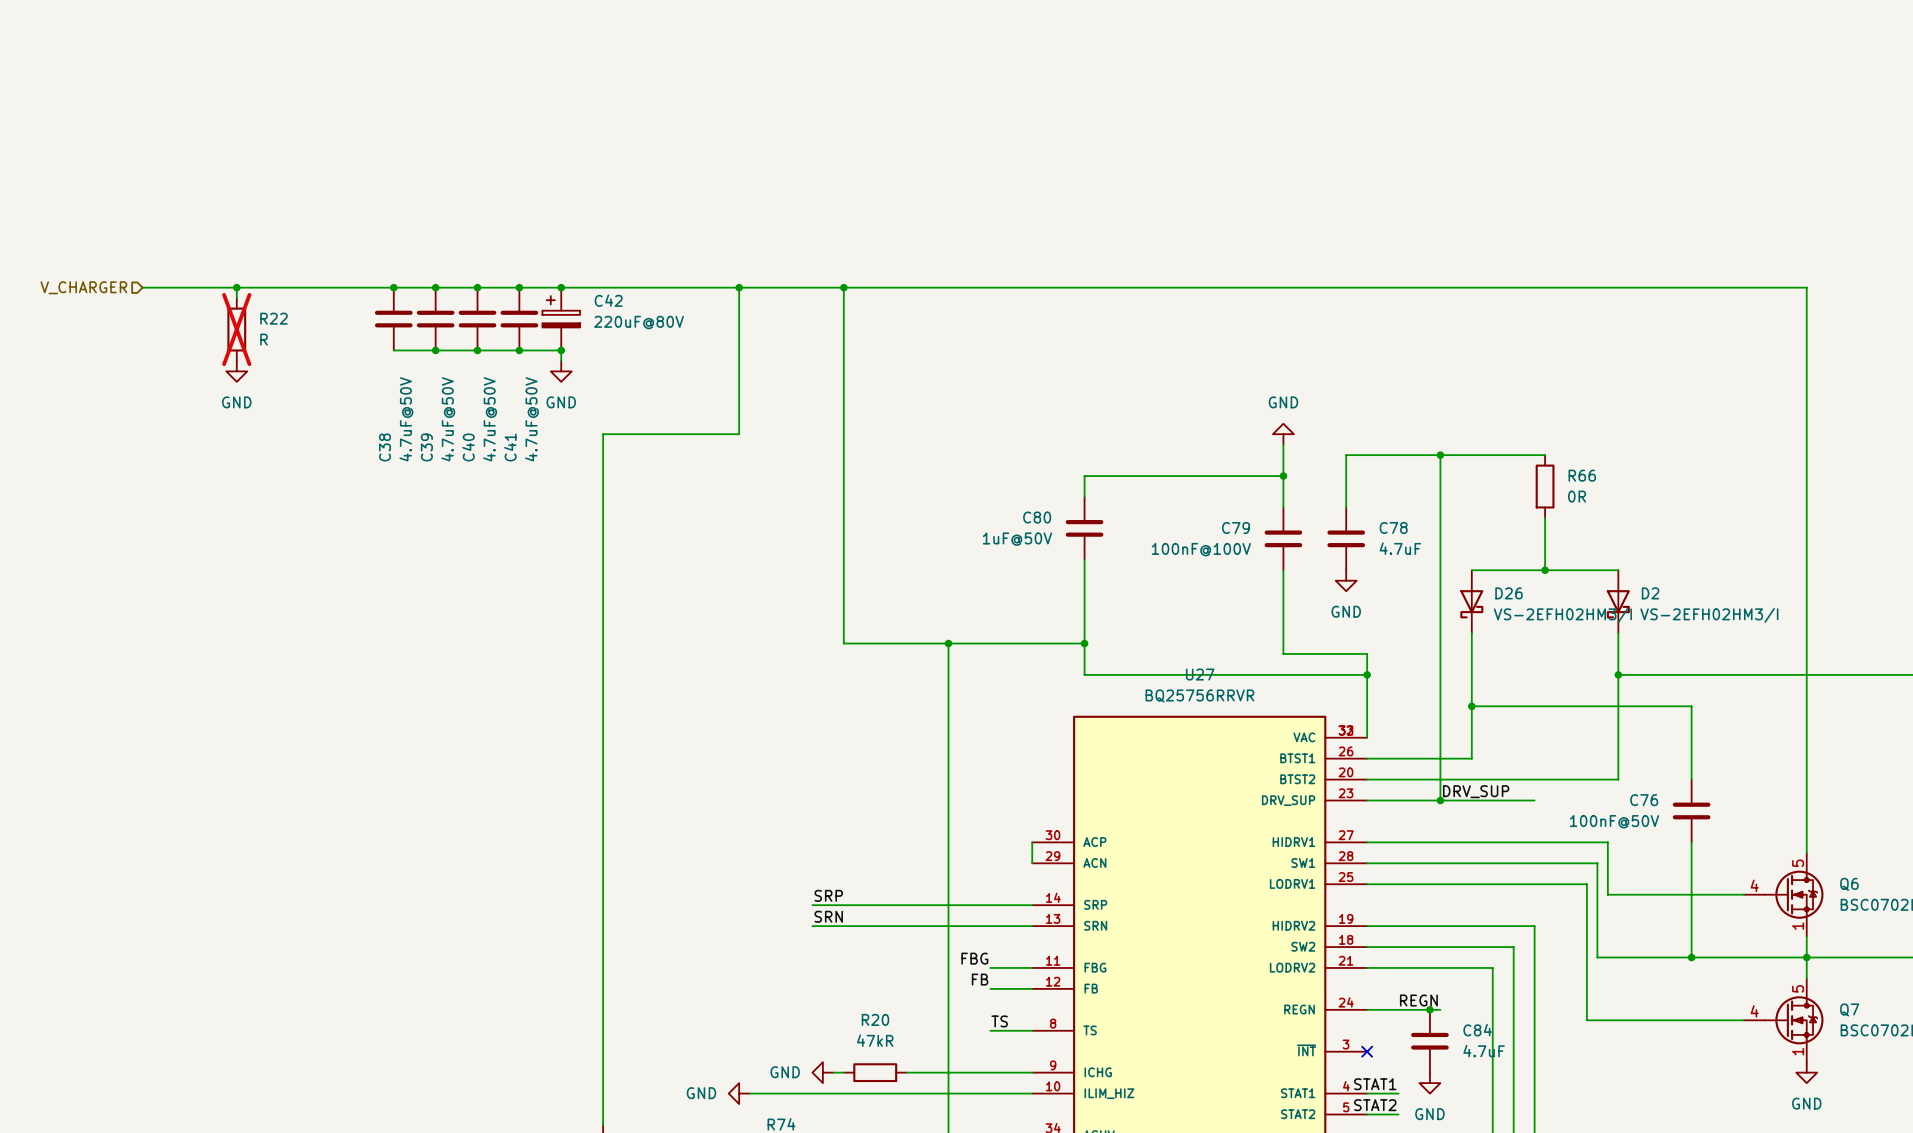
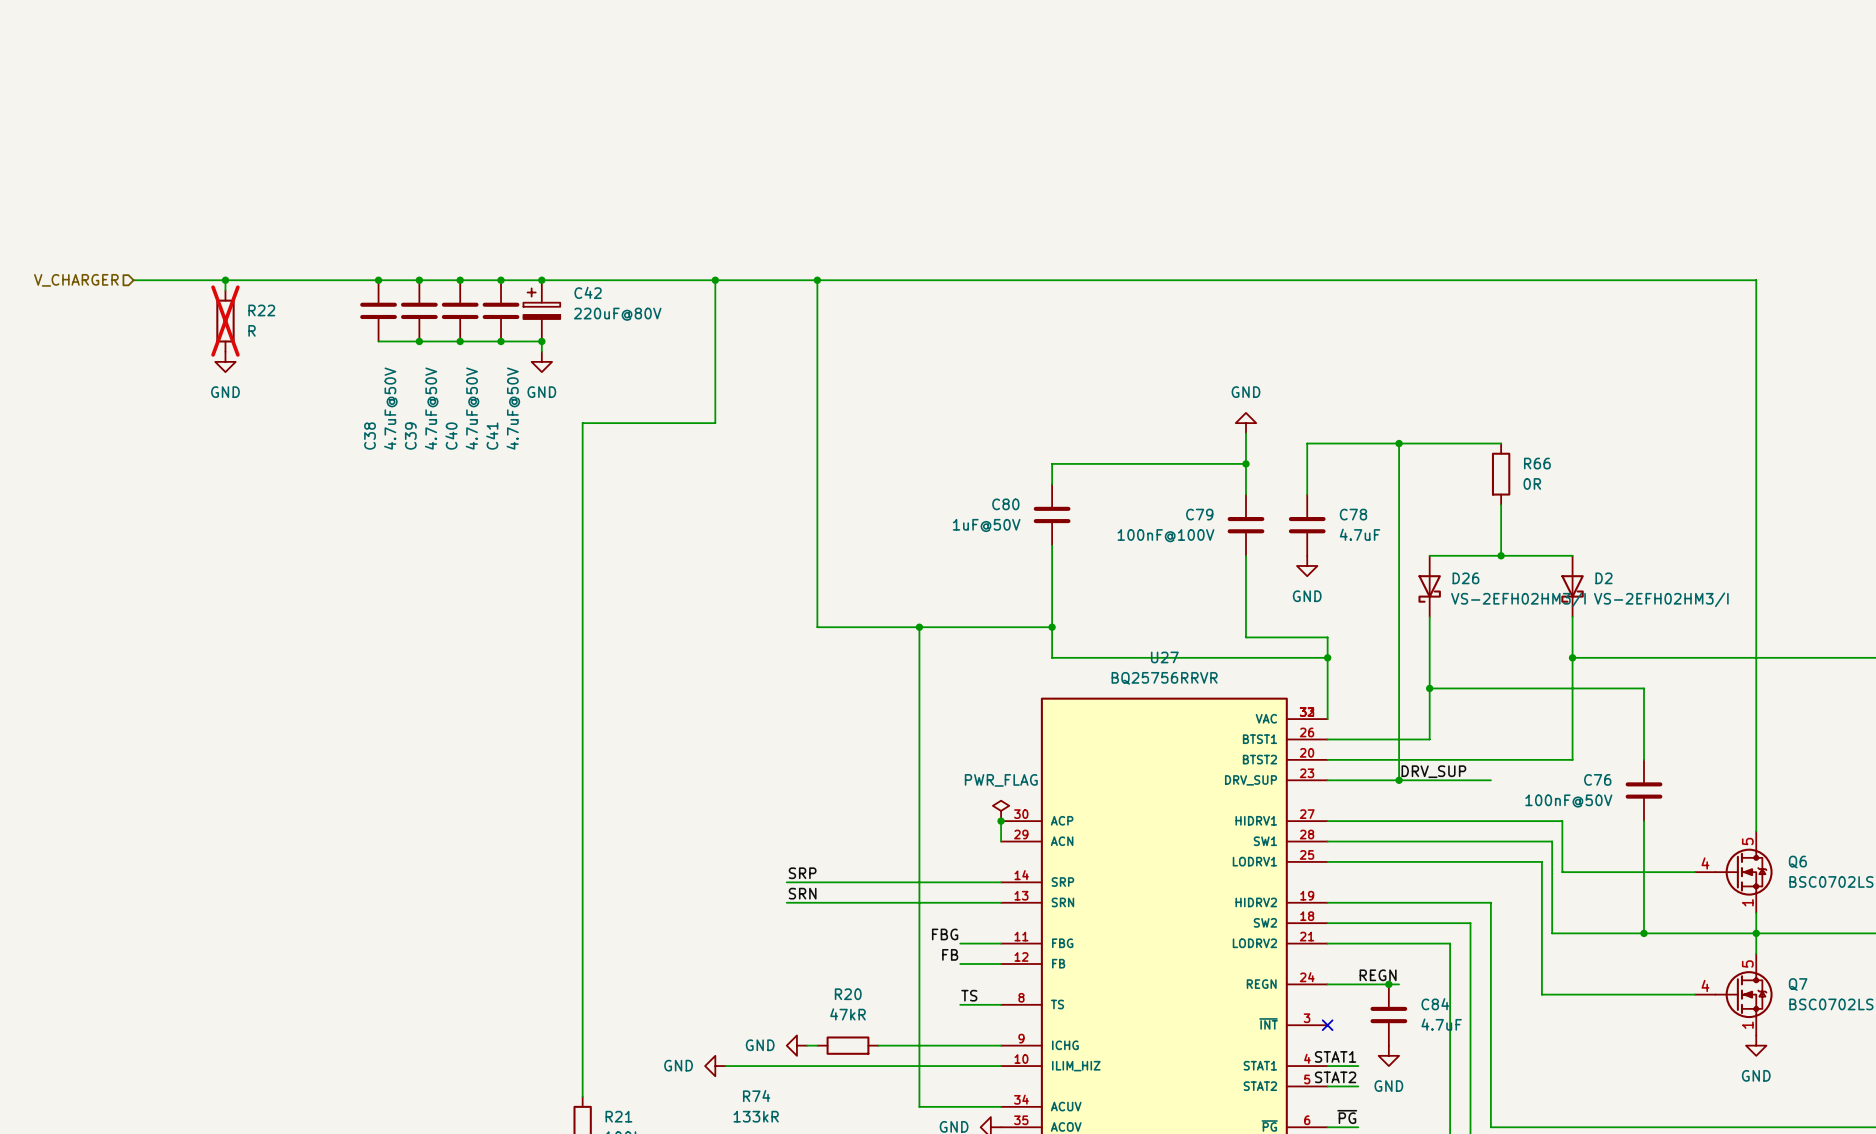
power symbol: none -> PWR_FLAG (1001, 810)
junction: none -> (1001, 821)

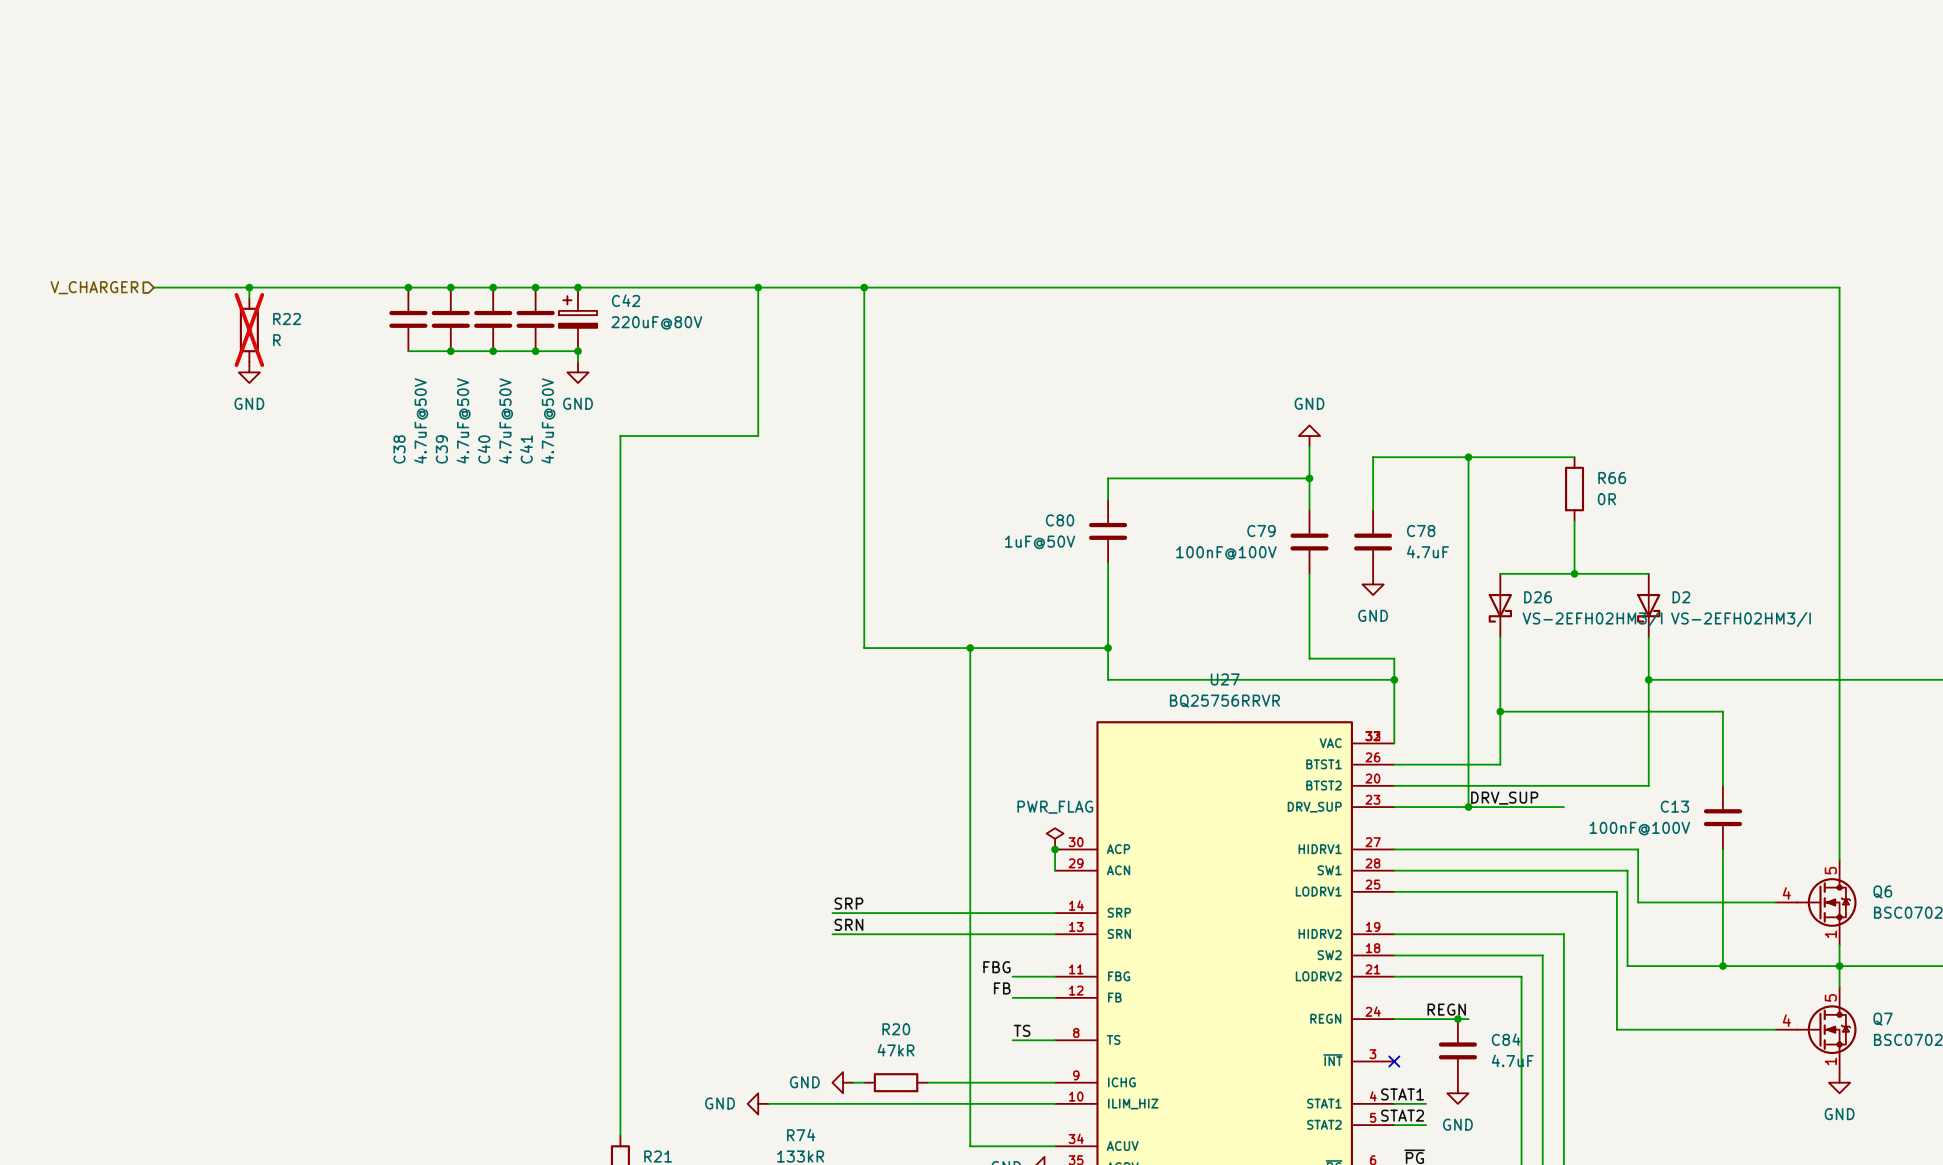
C76 name: C76 (1597, 779) -> C13 (1674, 806)
C76 value: 100nF@50V (1568, 801) -> 100nF@100V (1639, 828)

